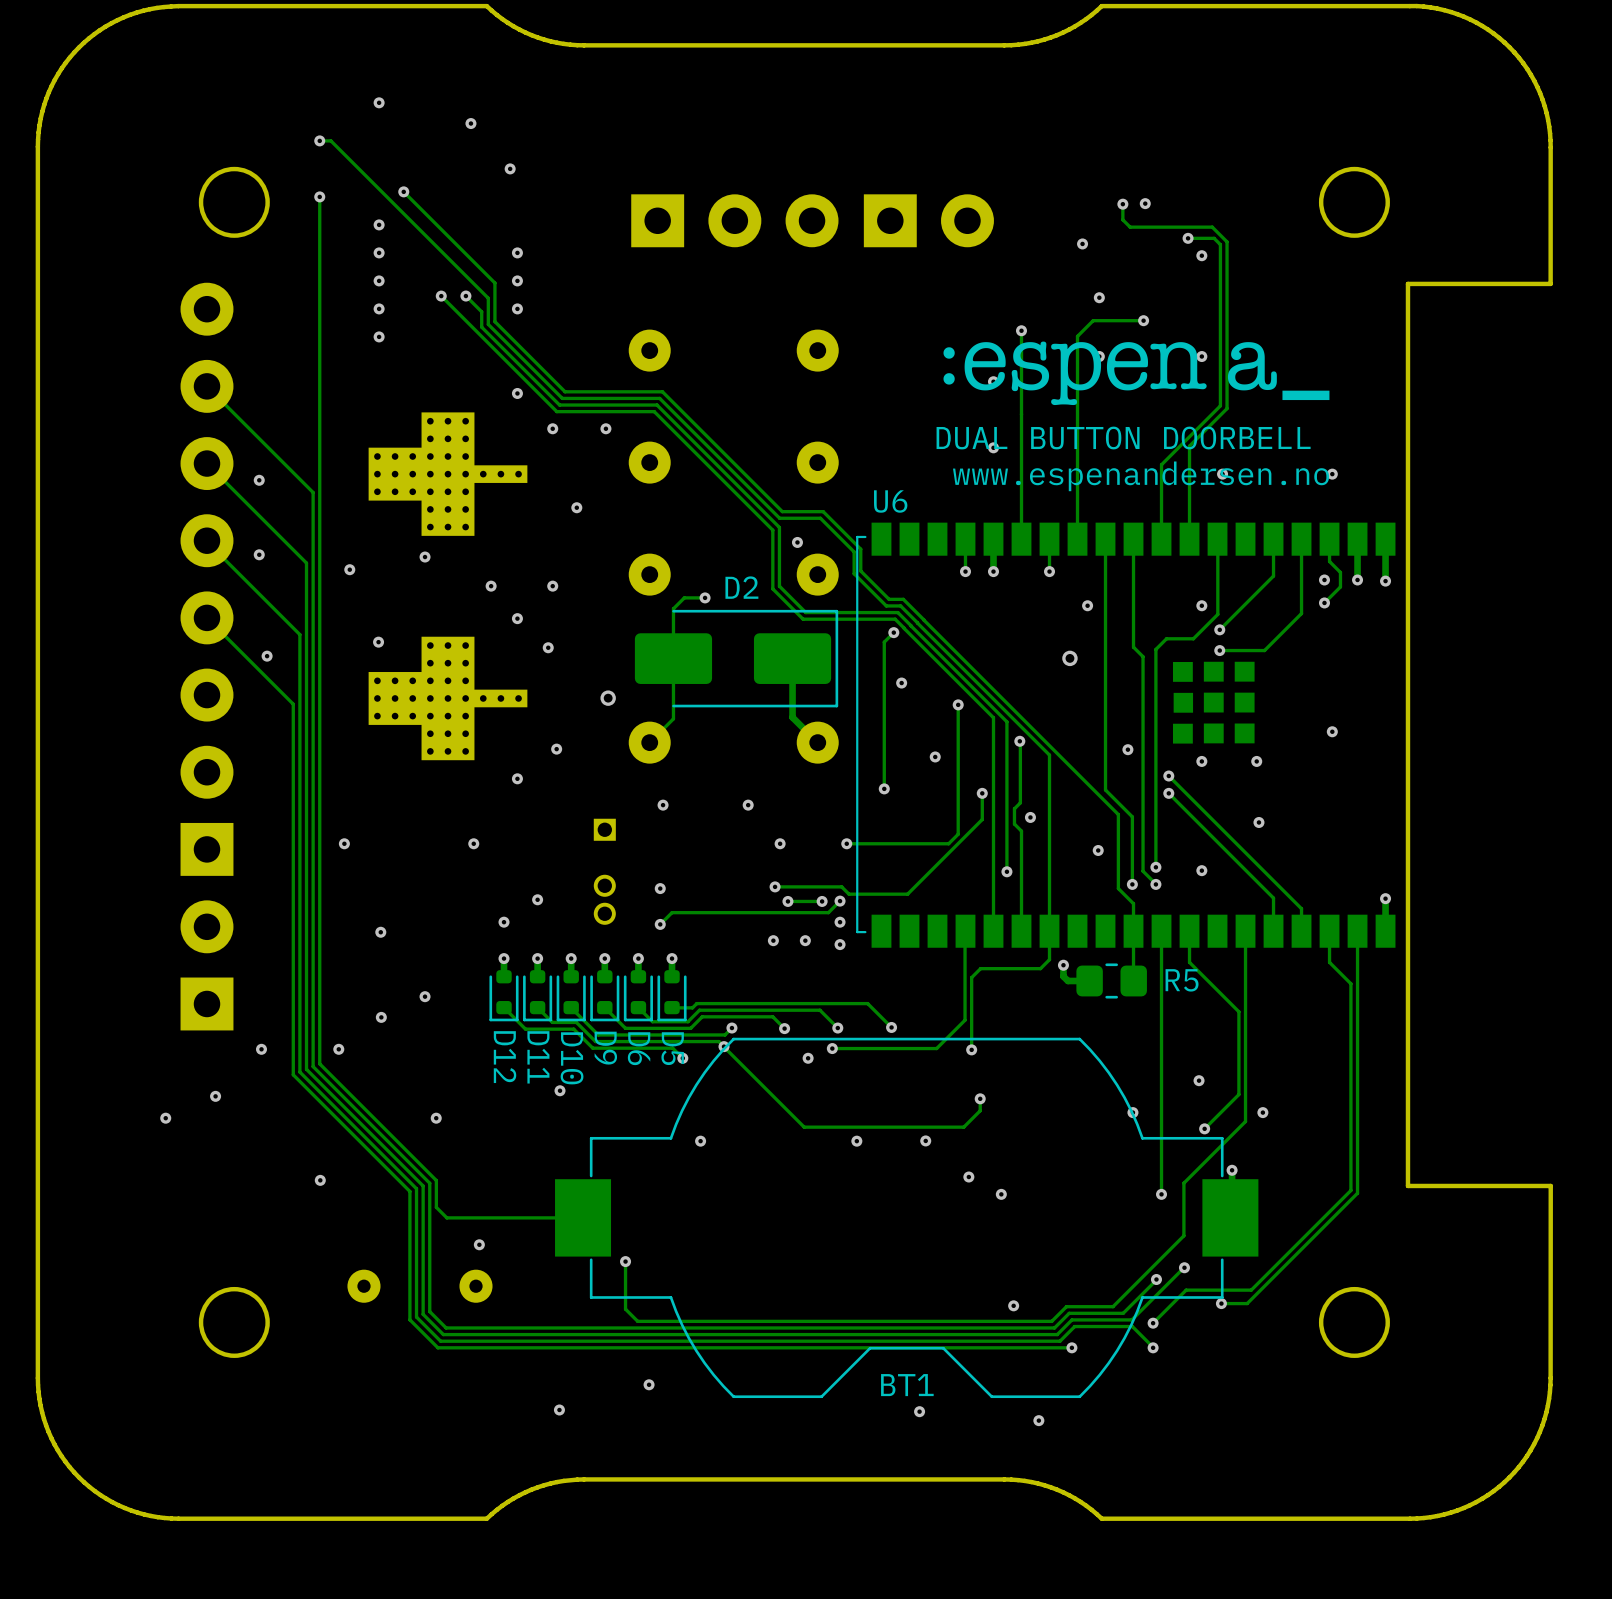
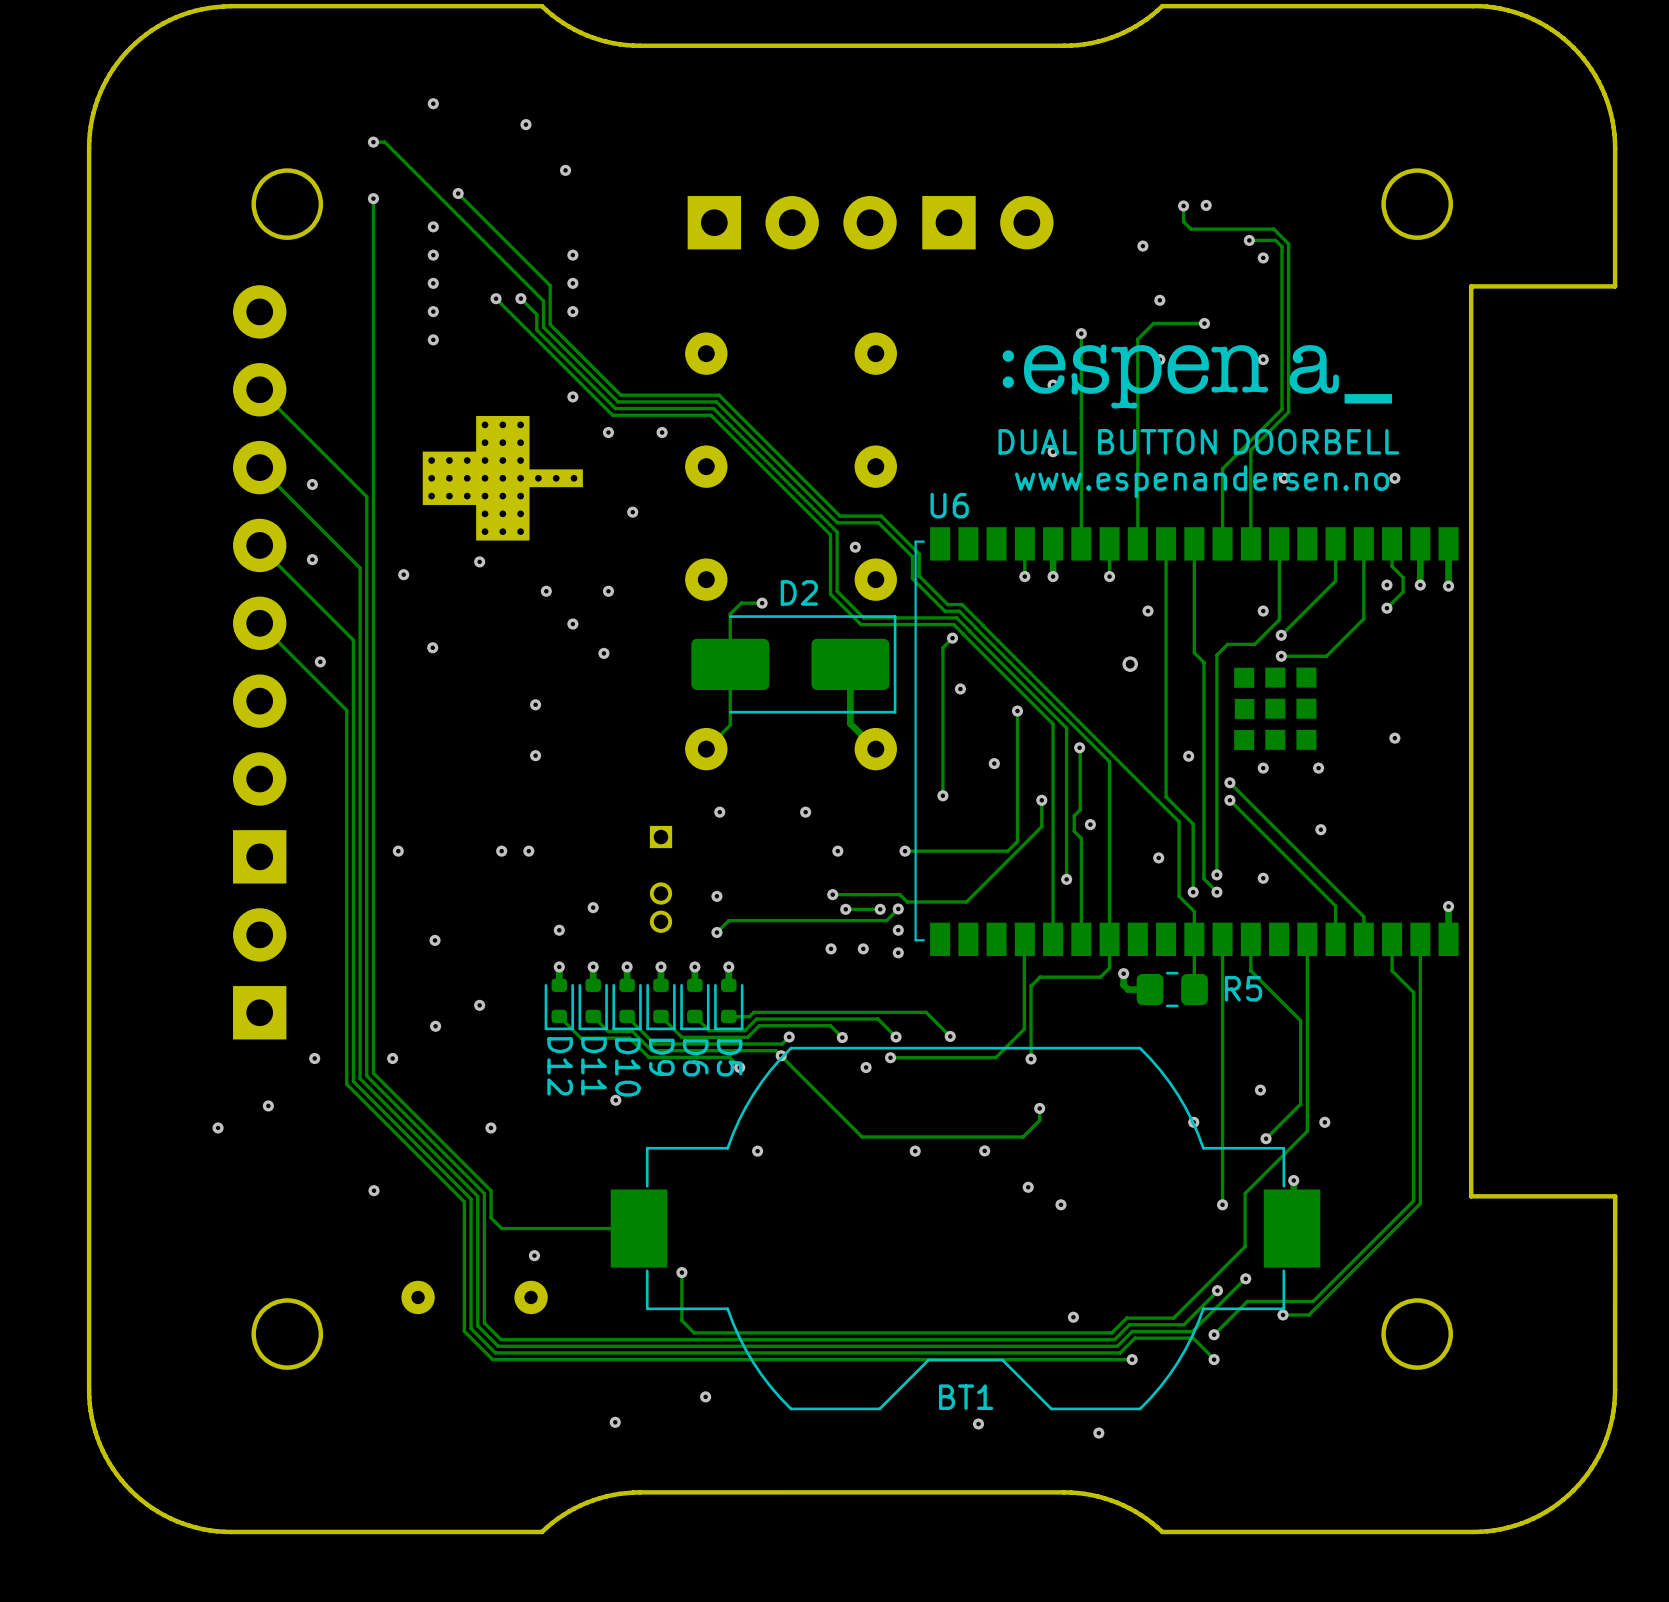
part: (447, 698) -> none
via: none -> (535, 704)
via: (608, 698) -> none
via: none -> (535, 755)
via: (556, 749) -> none
via: (517, 778) -> none
via: none -> (501, 851)

